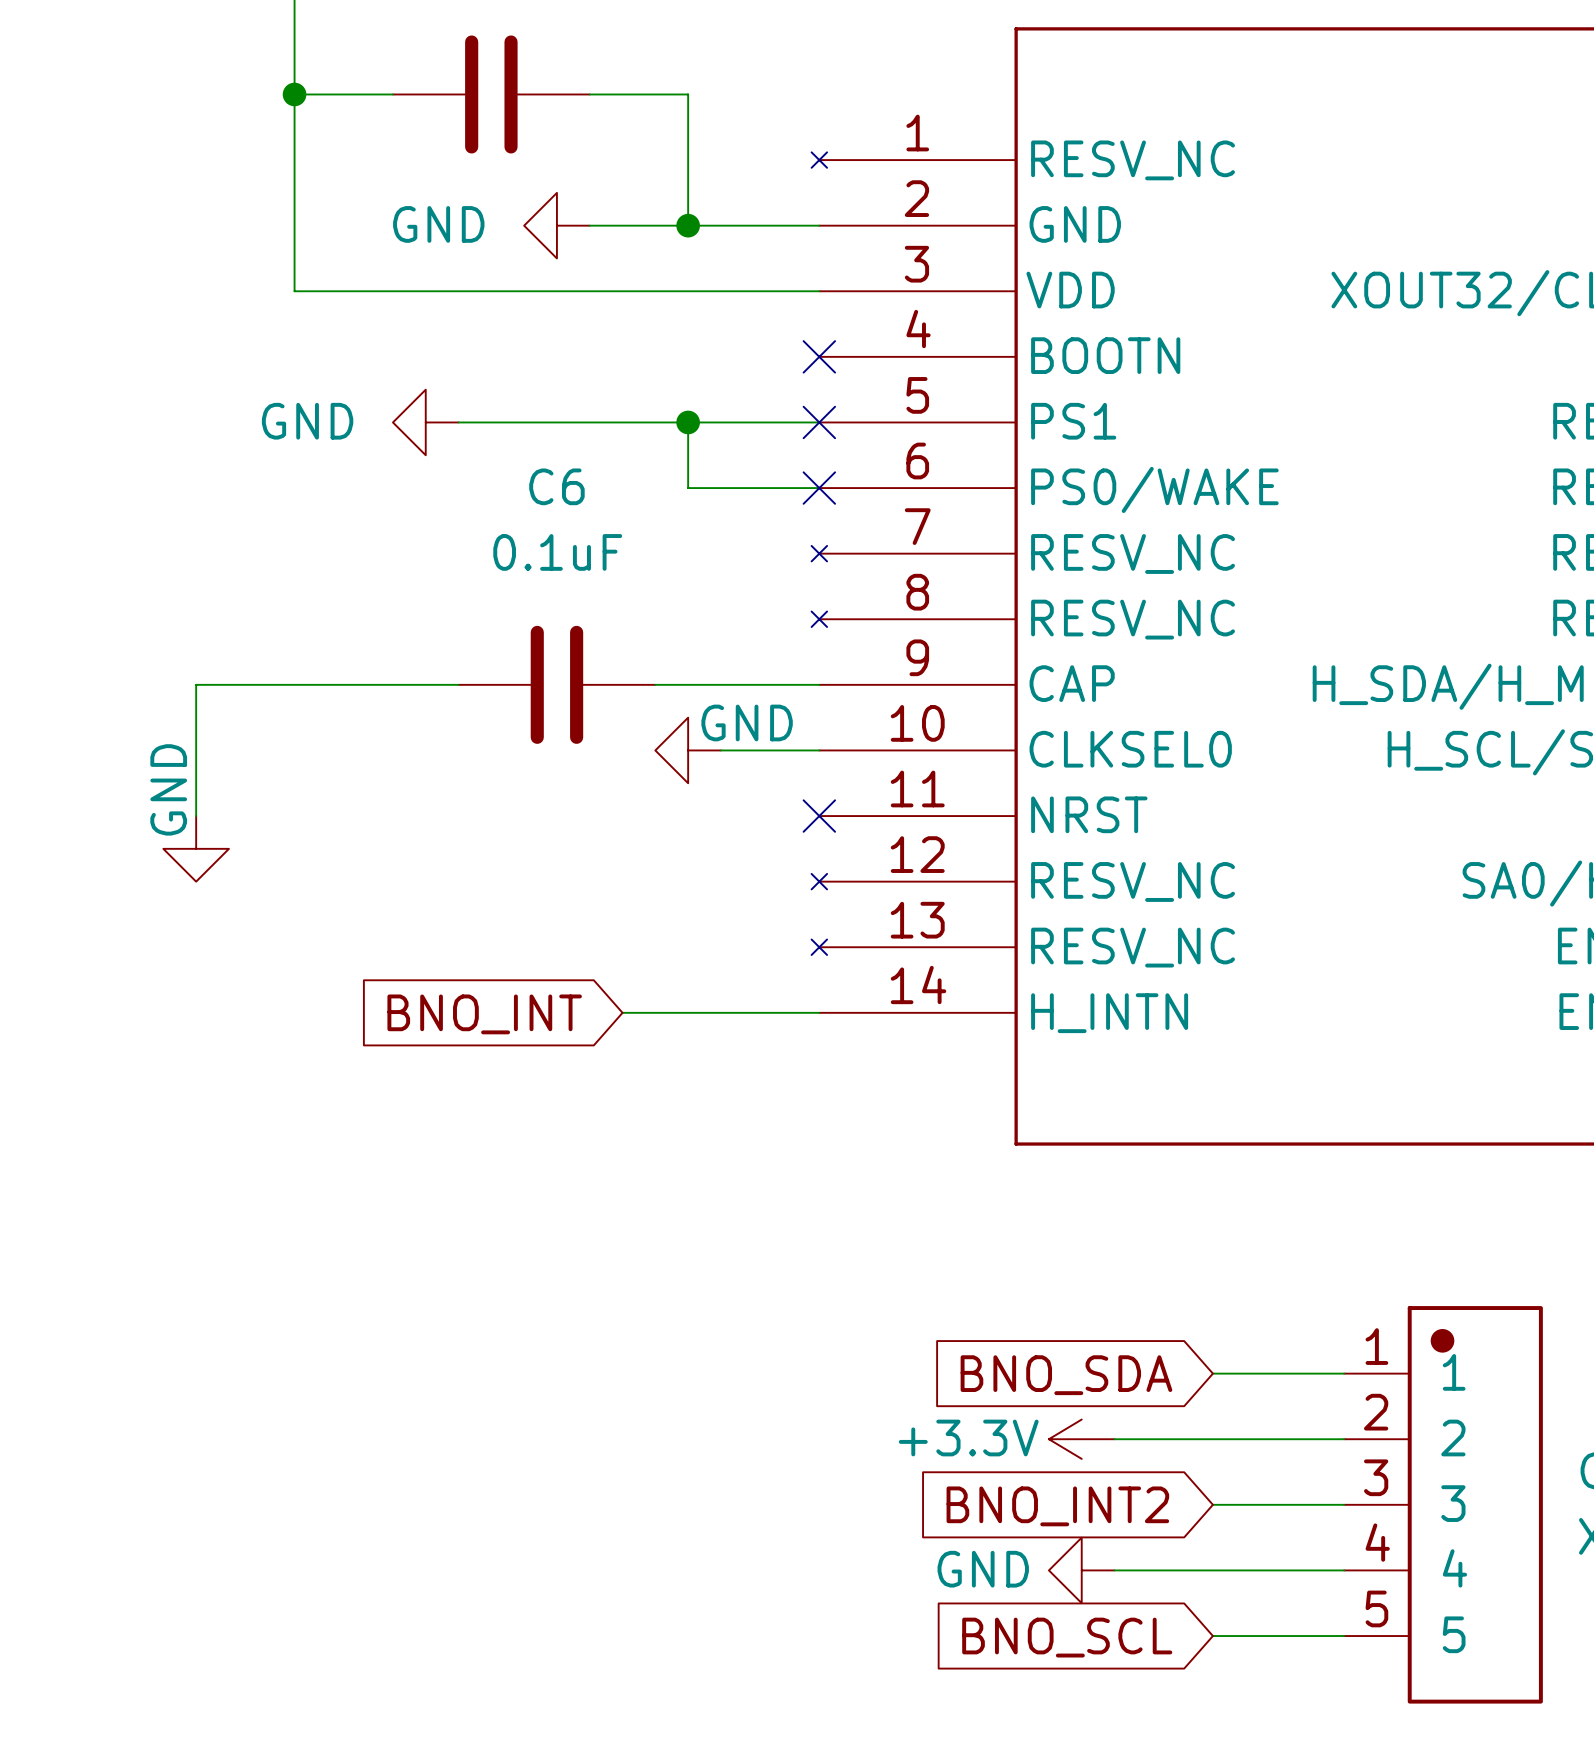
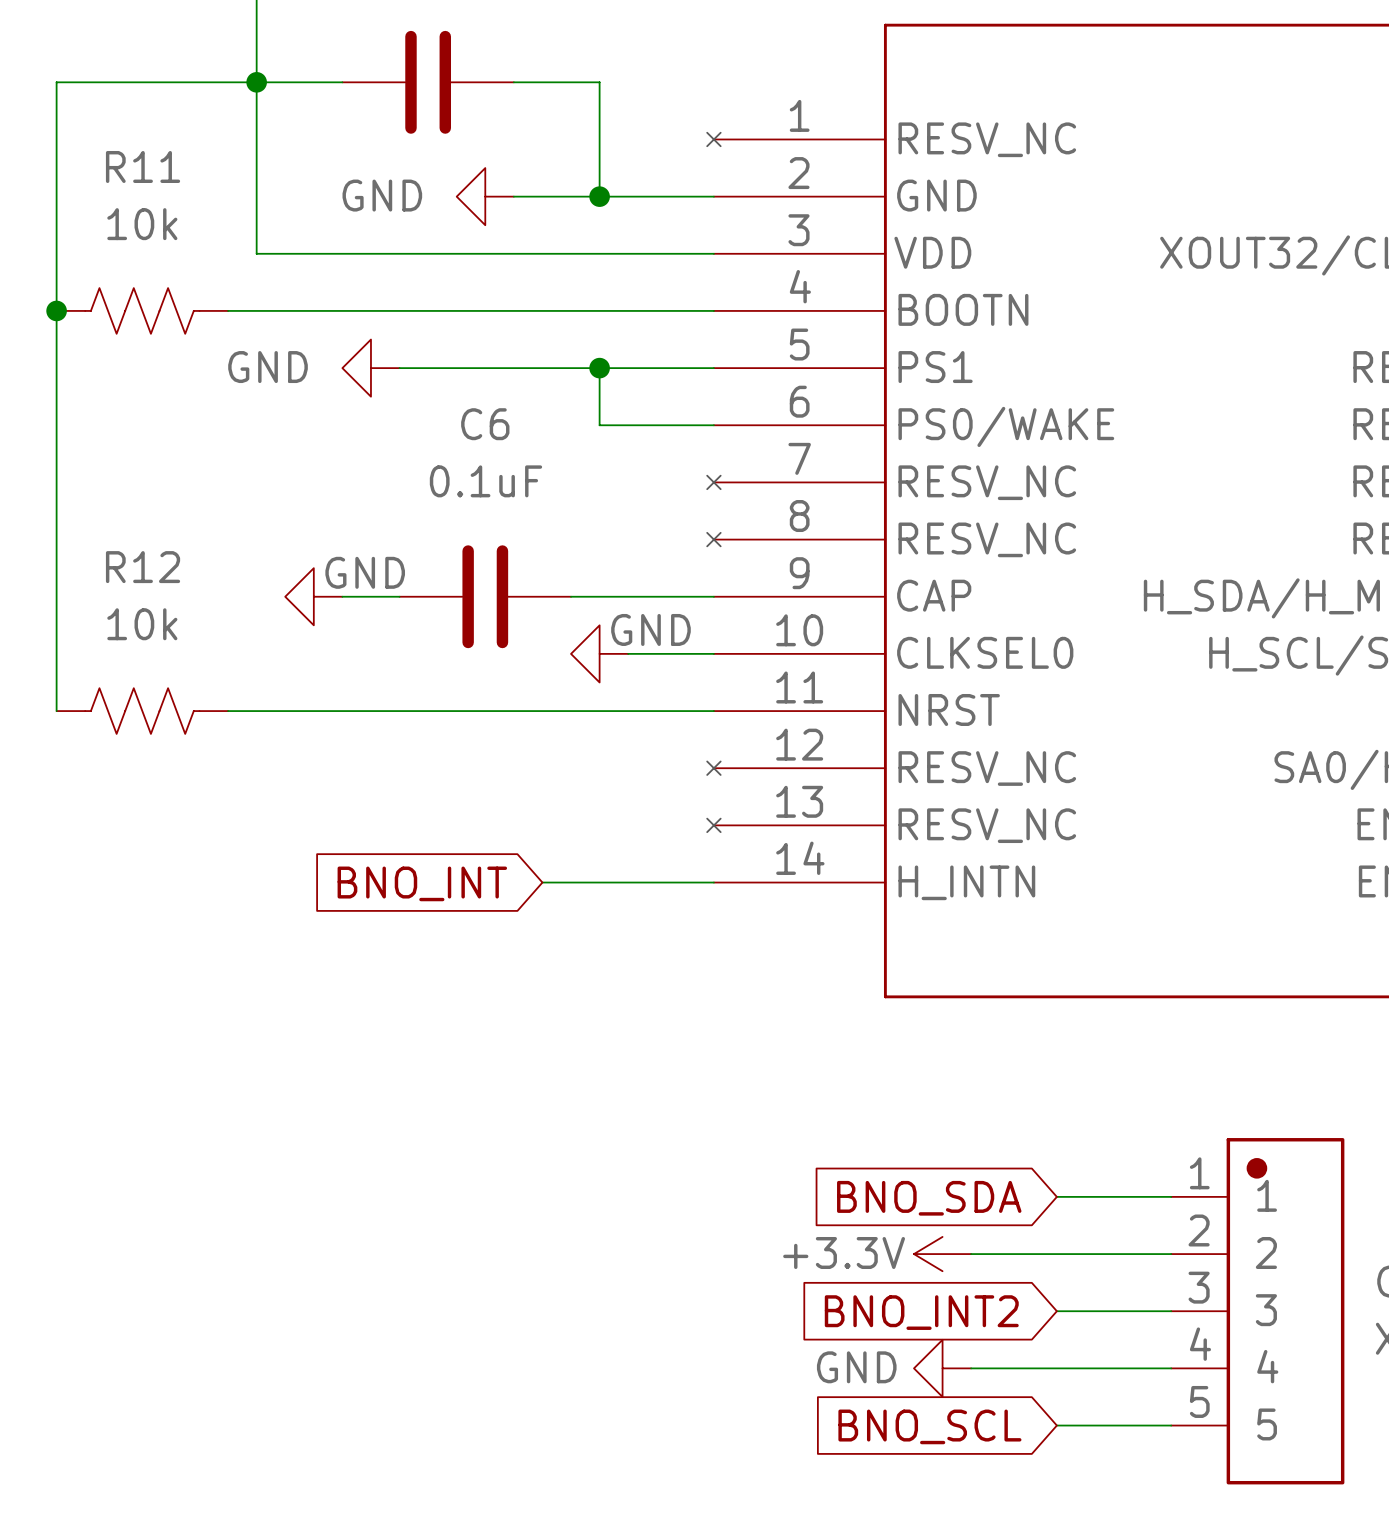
wire: none -> (256, 82) (56, 82) (56, 711)
junction: none -> (56, 310)
R11: none -> 10k (142, 310)
wire: none -> (228, 310) (713, 310)
no-connect mark: (819, 356) -> none
no-connect mark: (819, 422) -> none
no-connect mark: (819, 488) -> none
wire: (392, 684) (196, 684) (196, 816) -> none
R12: none -> 10k (142, 711)
wire: none -> (228, 711) (713, 711)
no-connect mark: (819, 816) -> none
power symbol rotation: 0° (196, 848) -> 90° clockwise (313, 596)
power symbol position: GND (196, 848) -> GND (313, 596)

